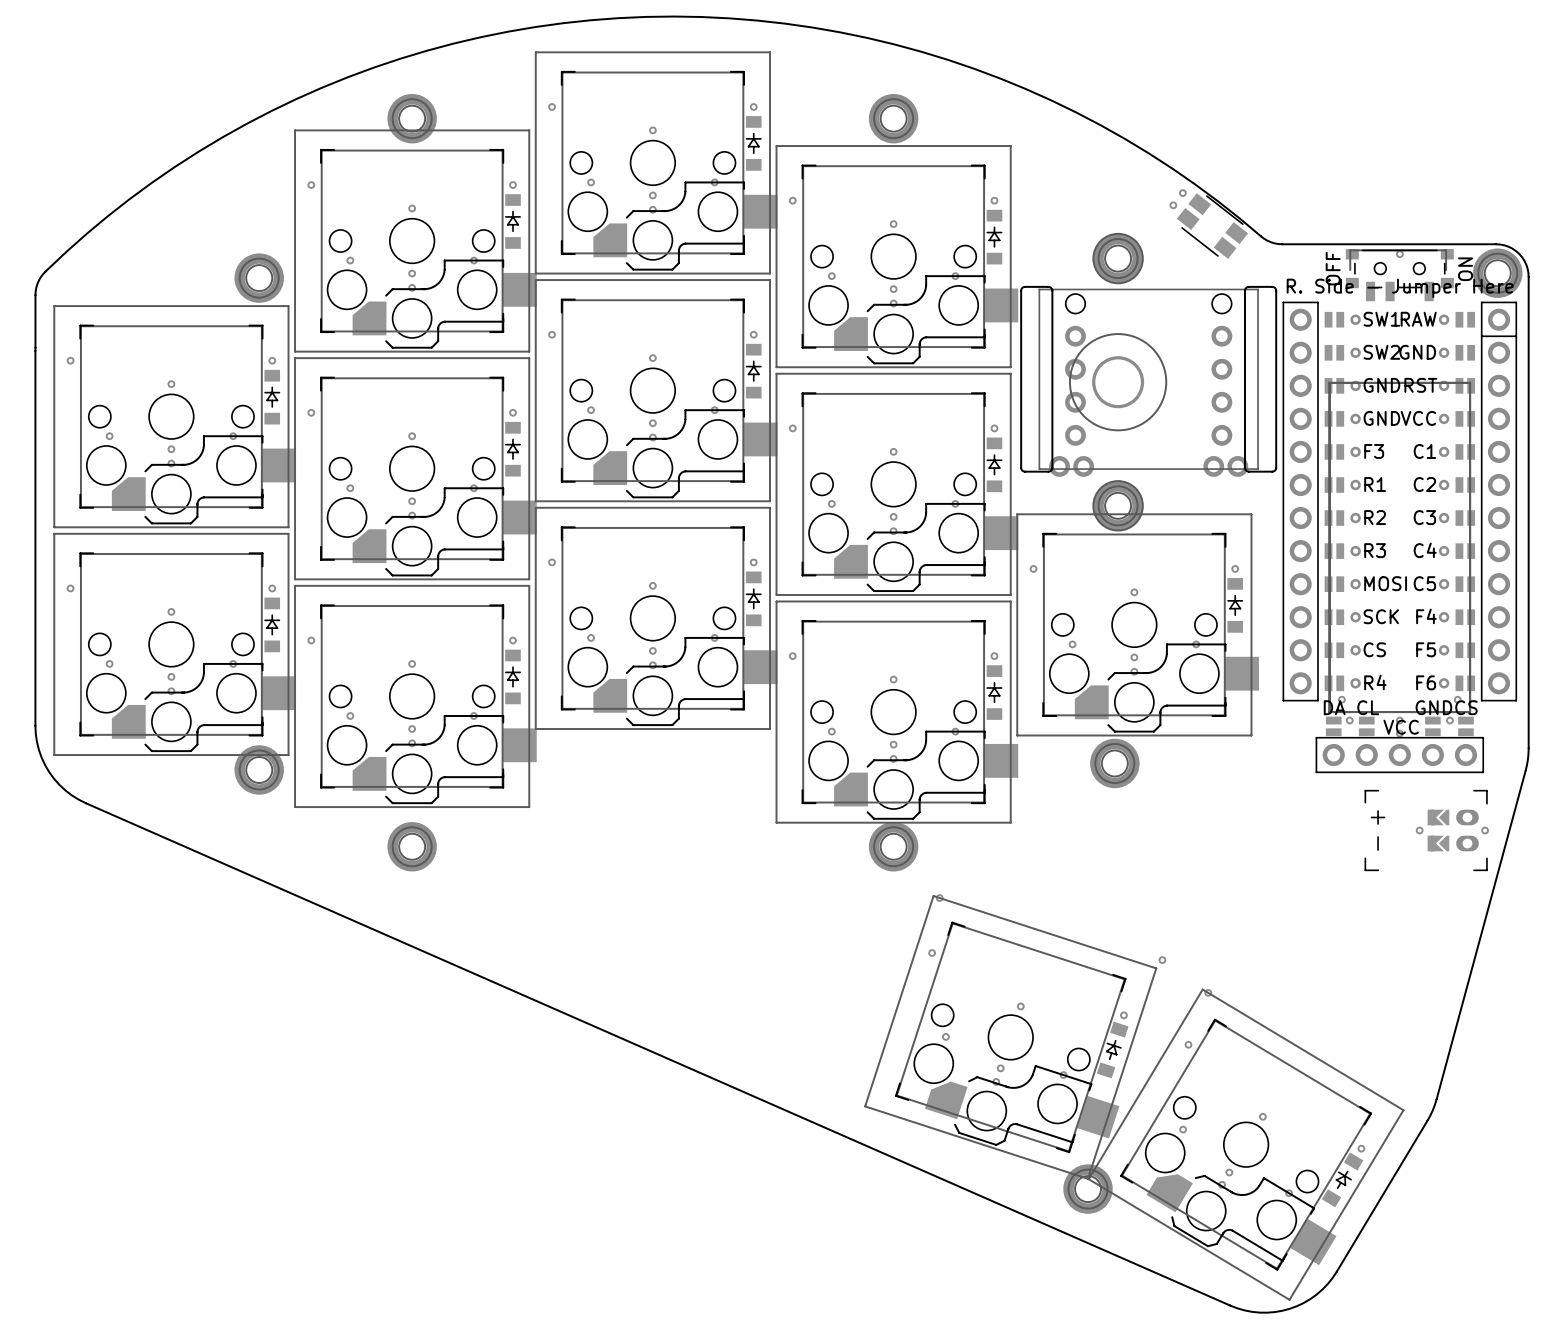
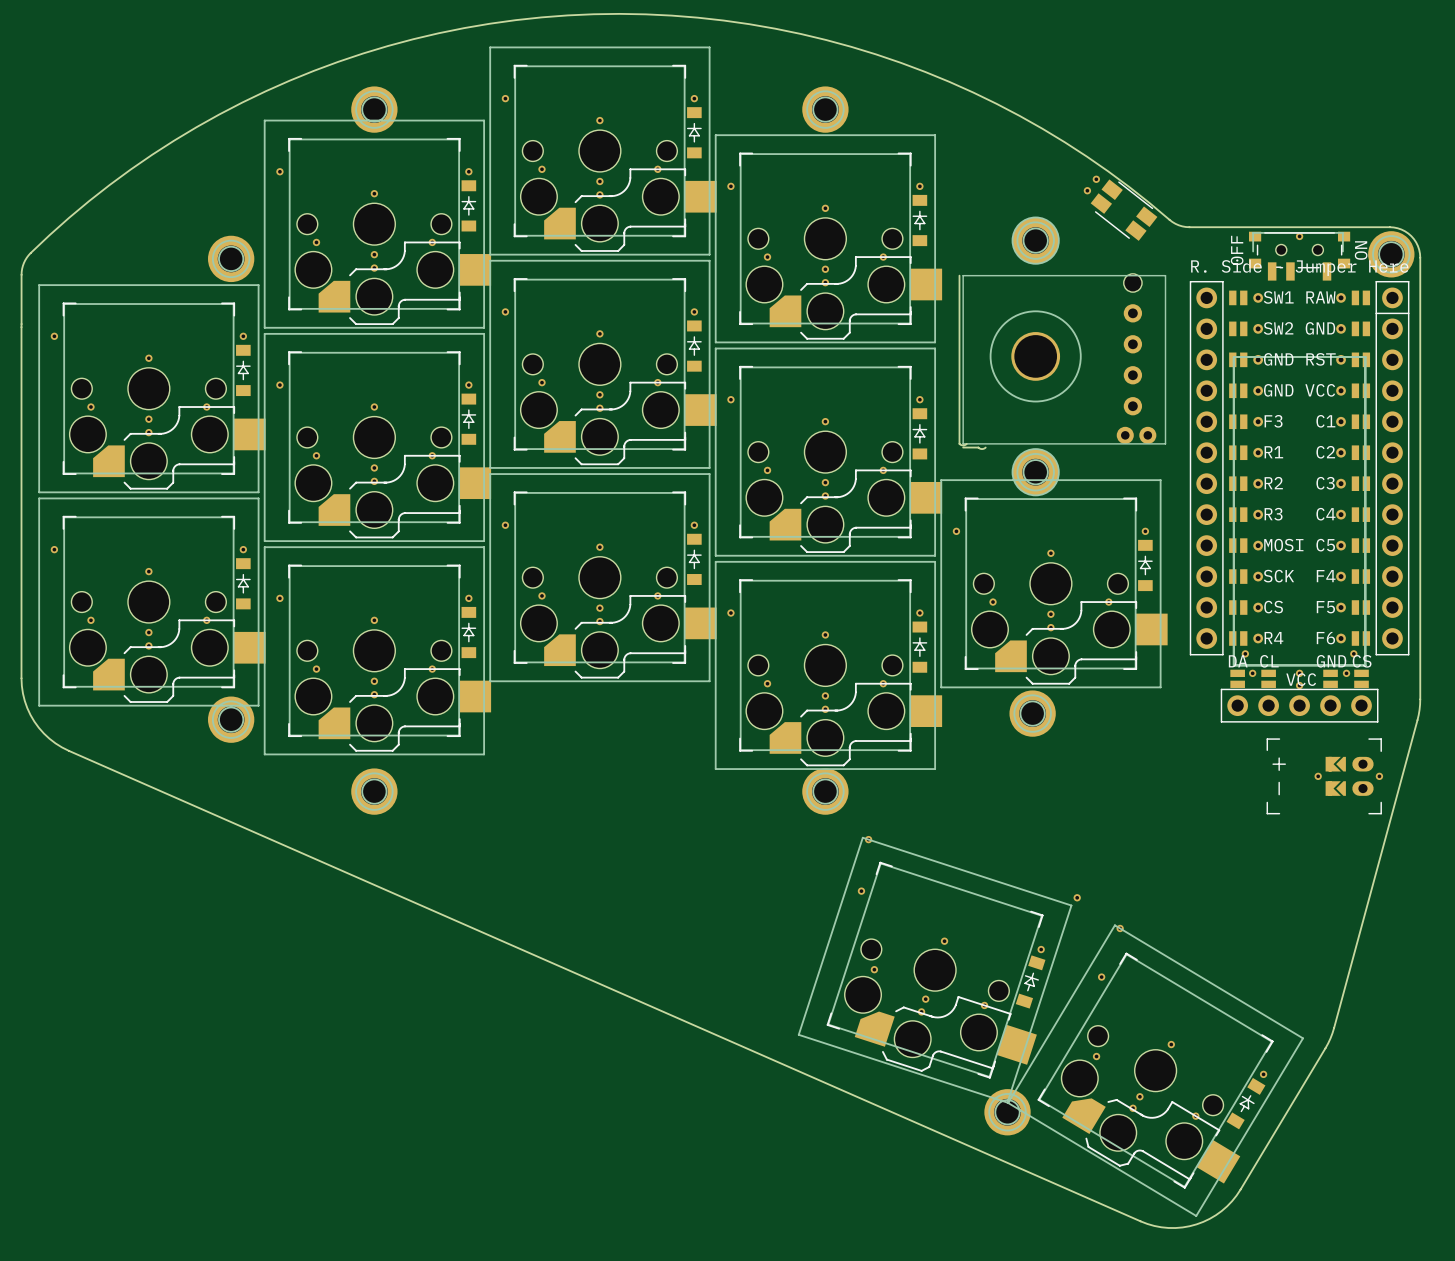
part footprint: [1020, 285, 1278, 477] -> [958, 273, 1167, 450]

